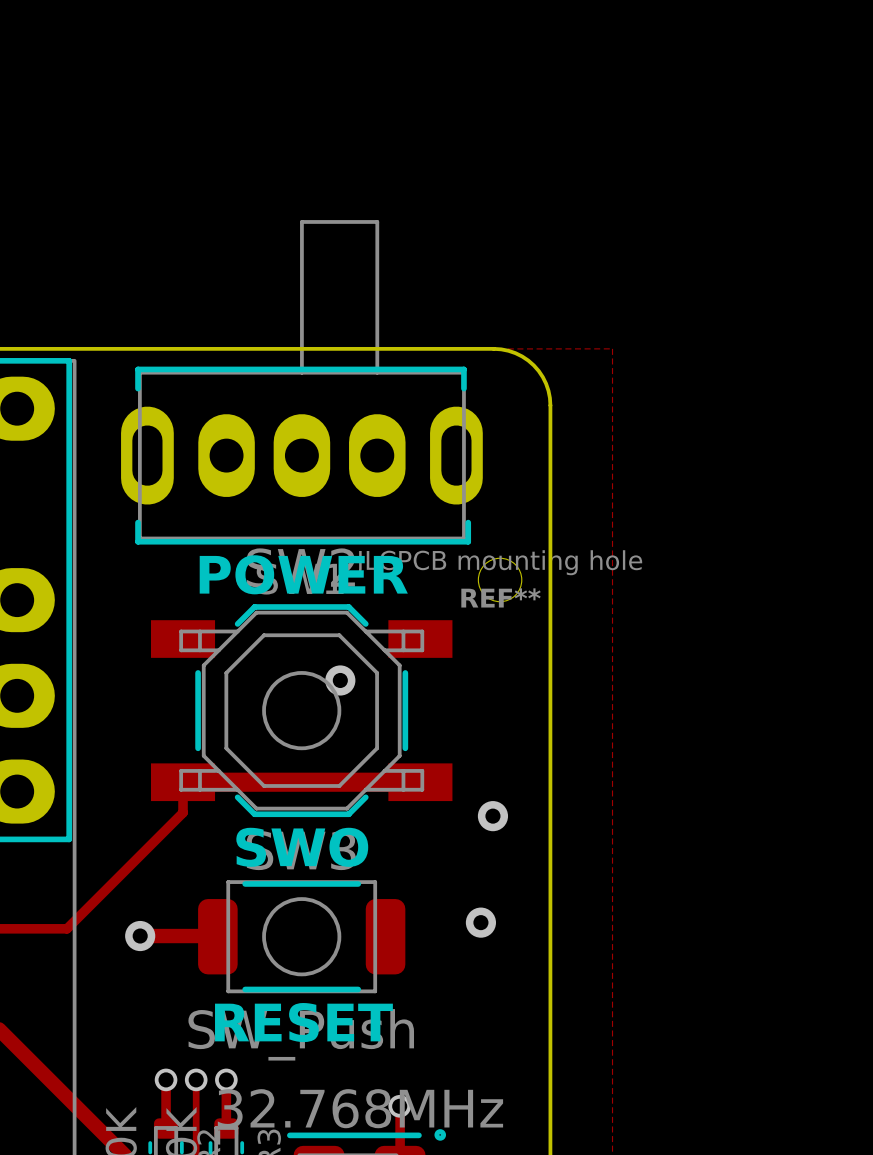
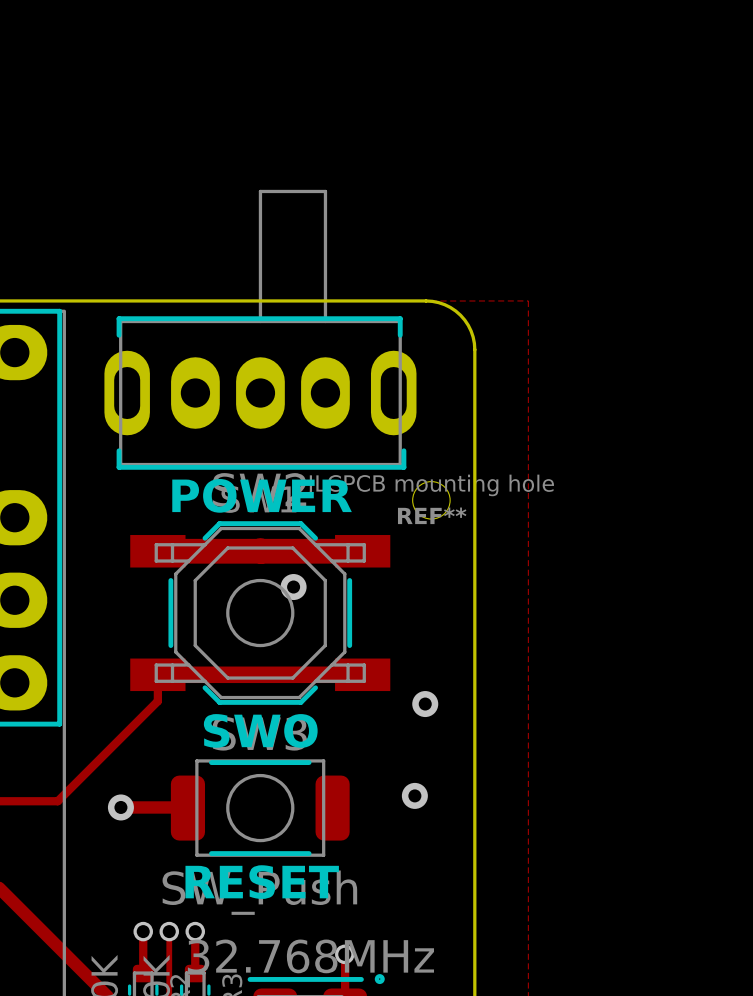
track: none -> (157, 551) (362, 551)

